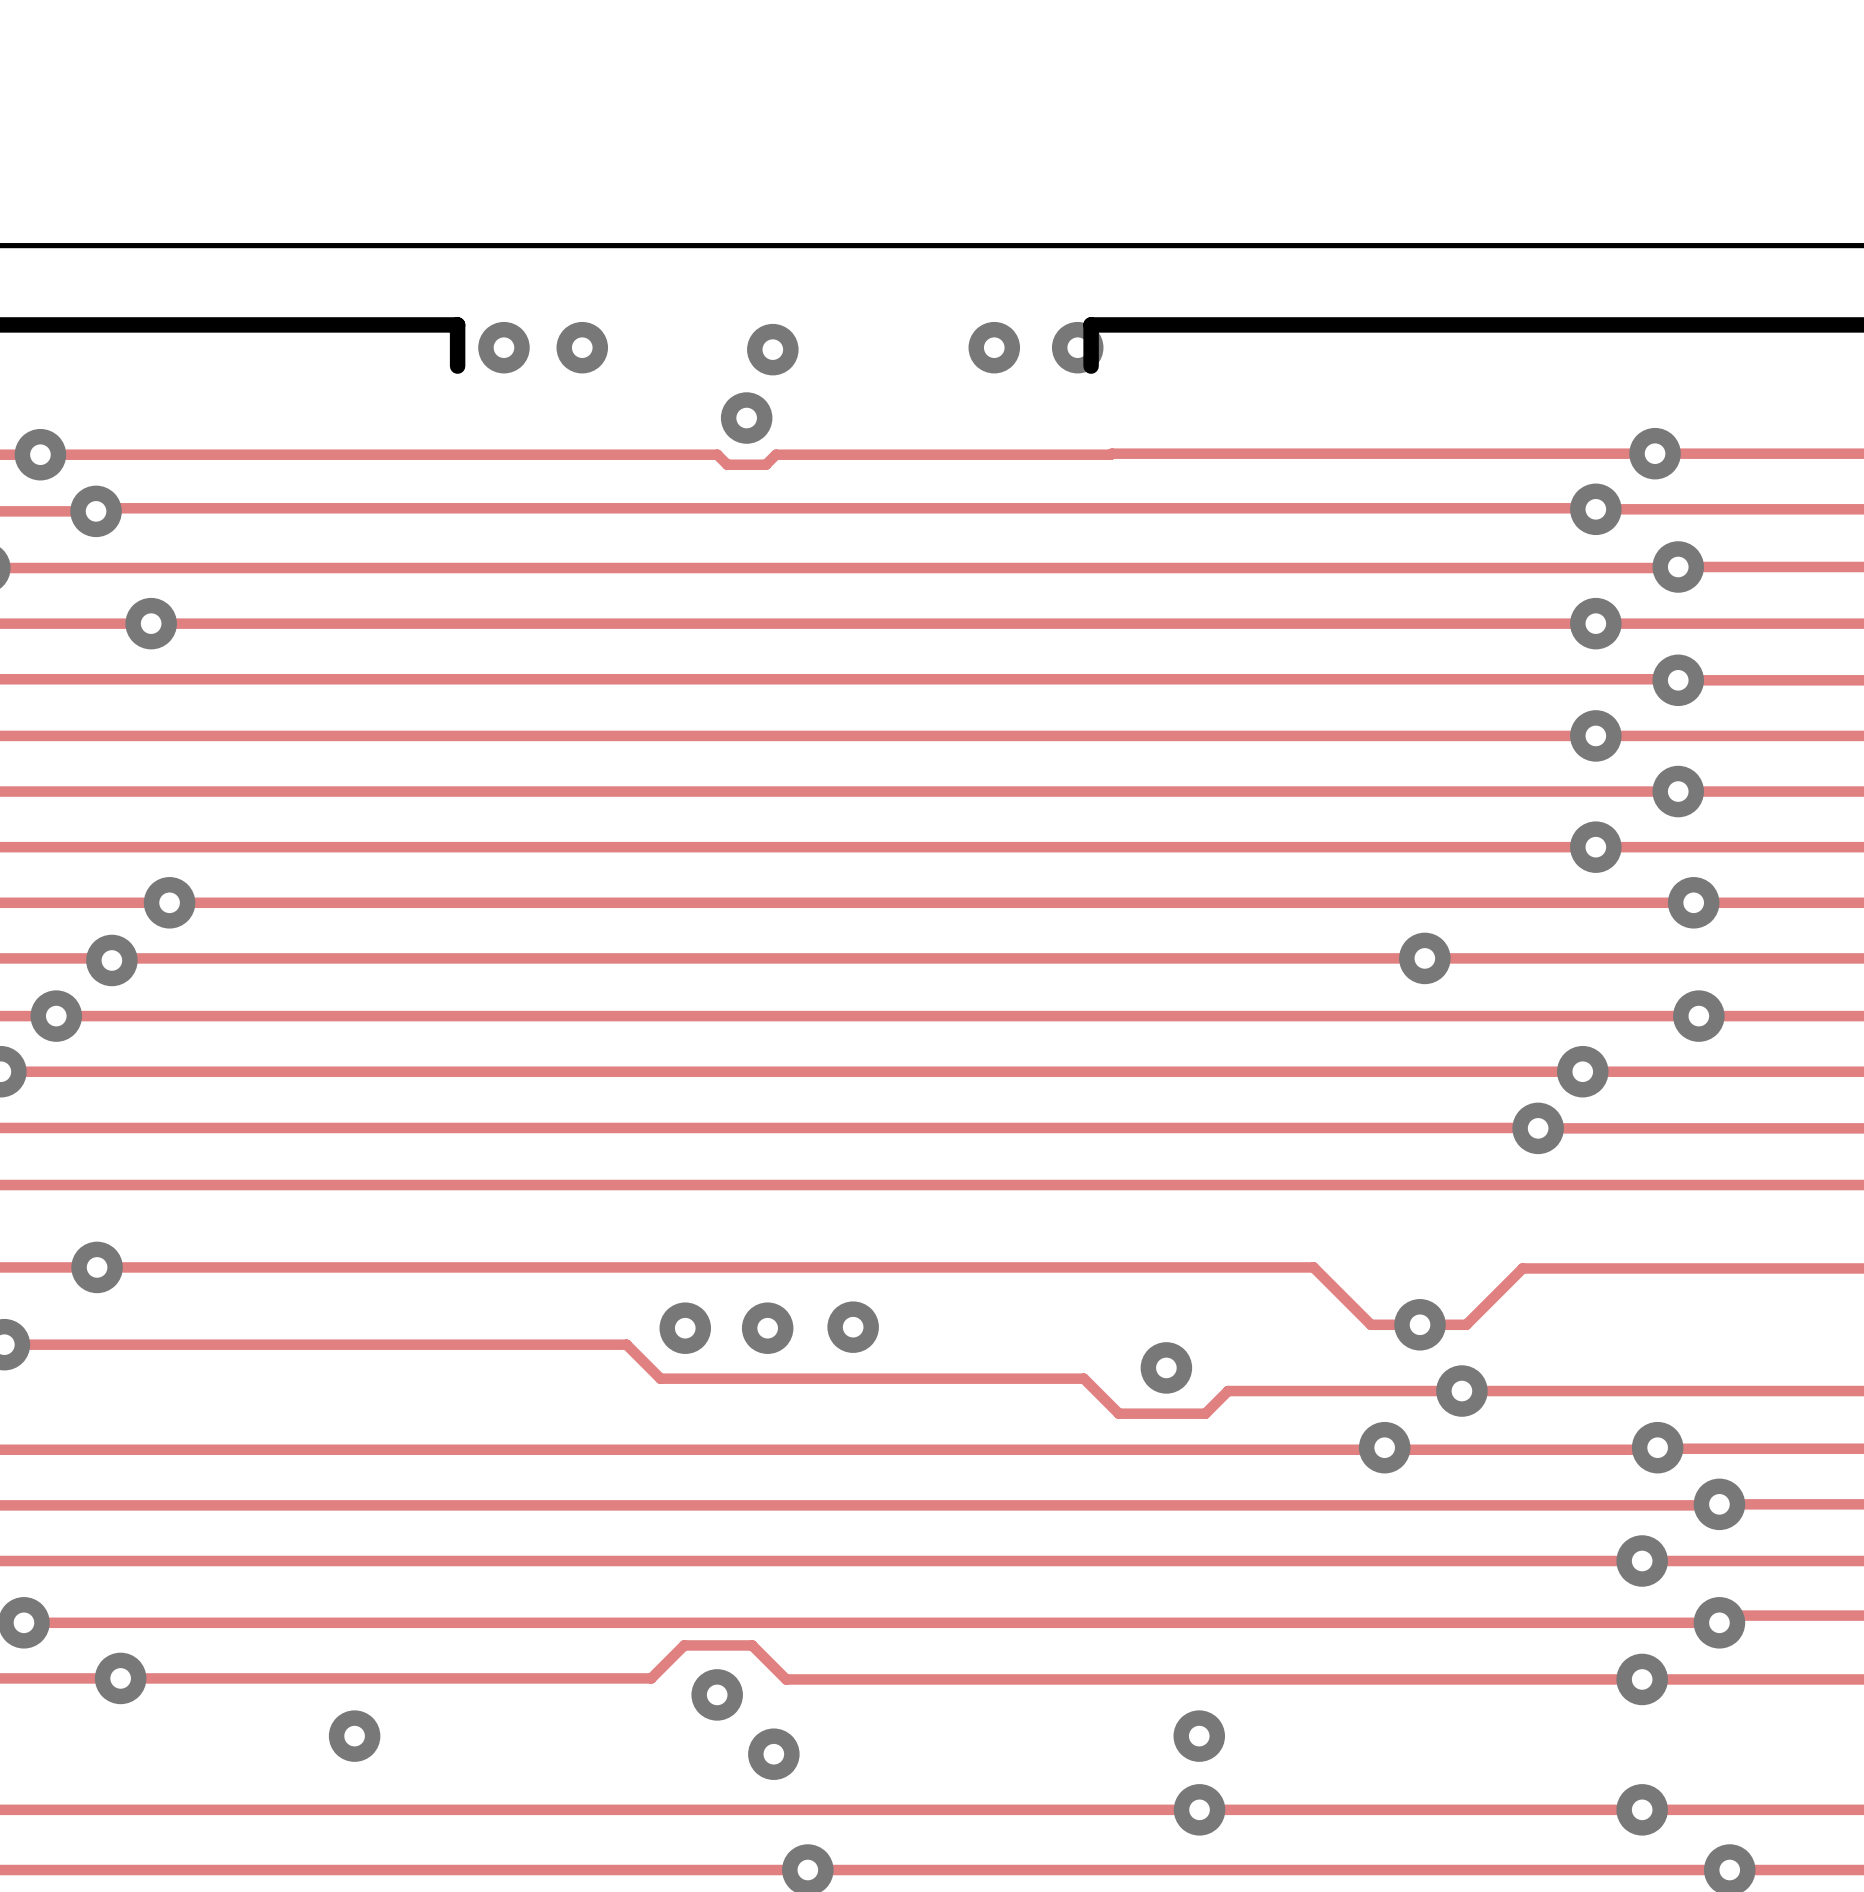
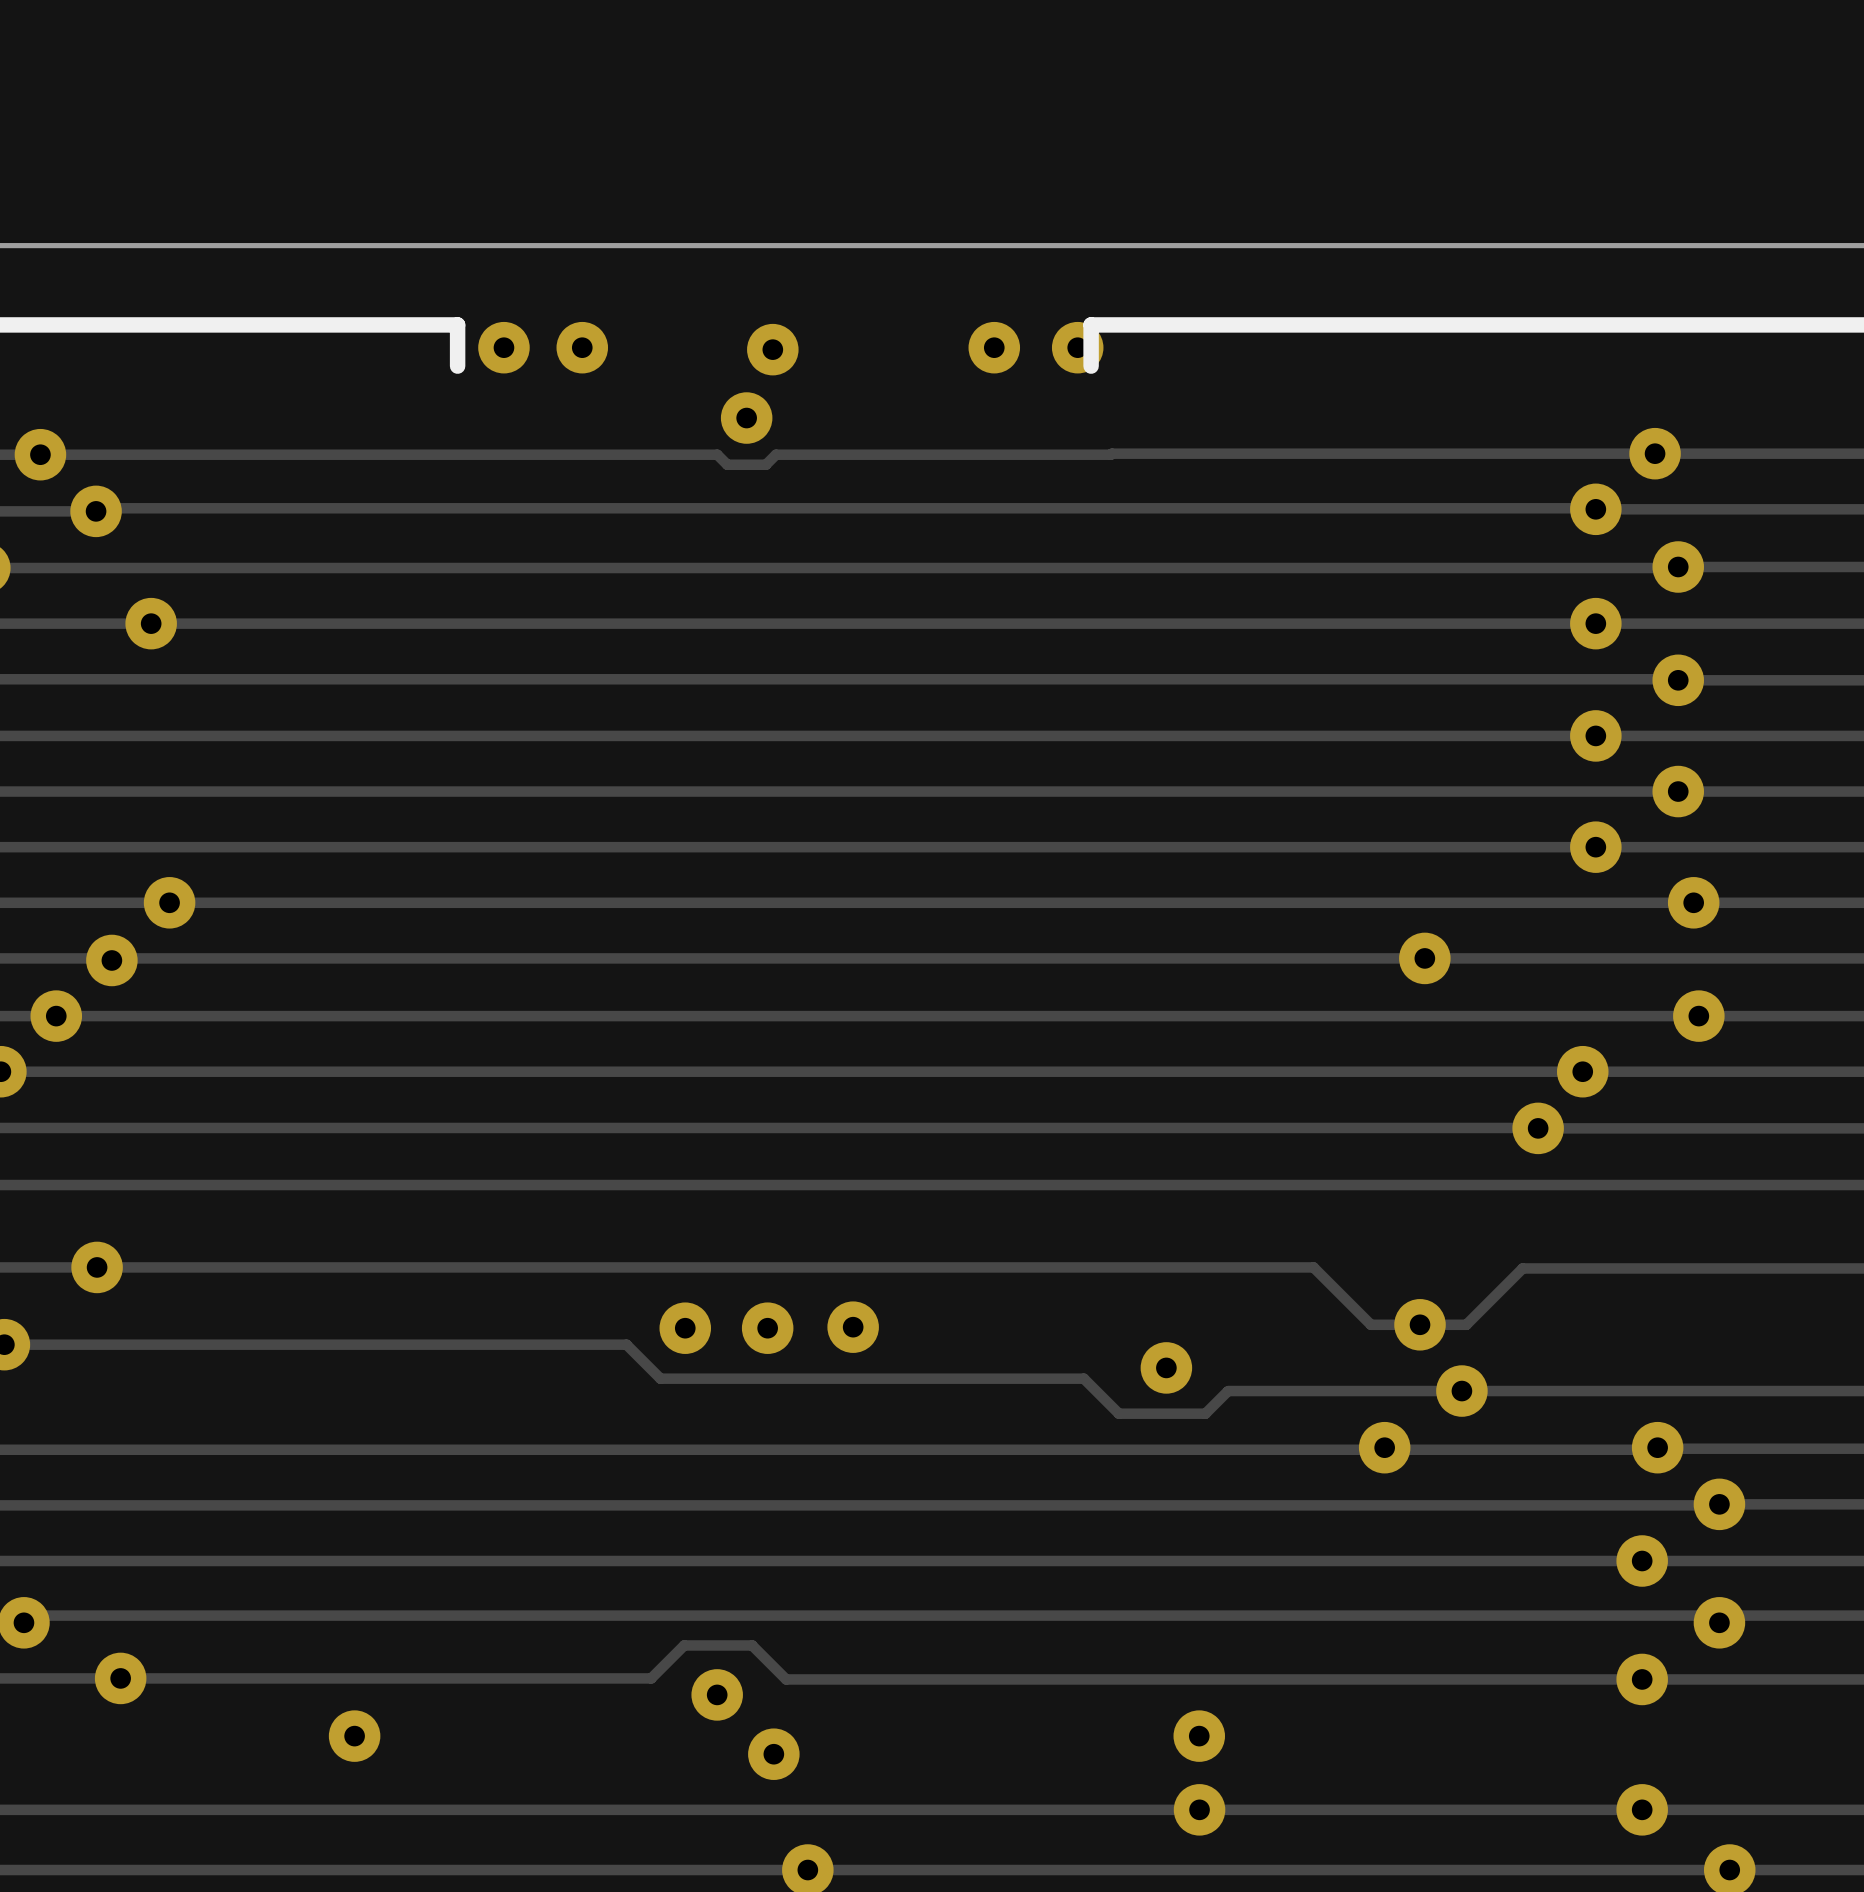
track: none -> (31, 1615) (1712, 1615)
track: (23, 1622) (1719, 1622) -> none

